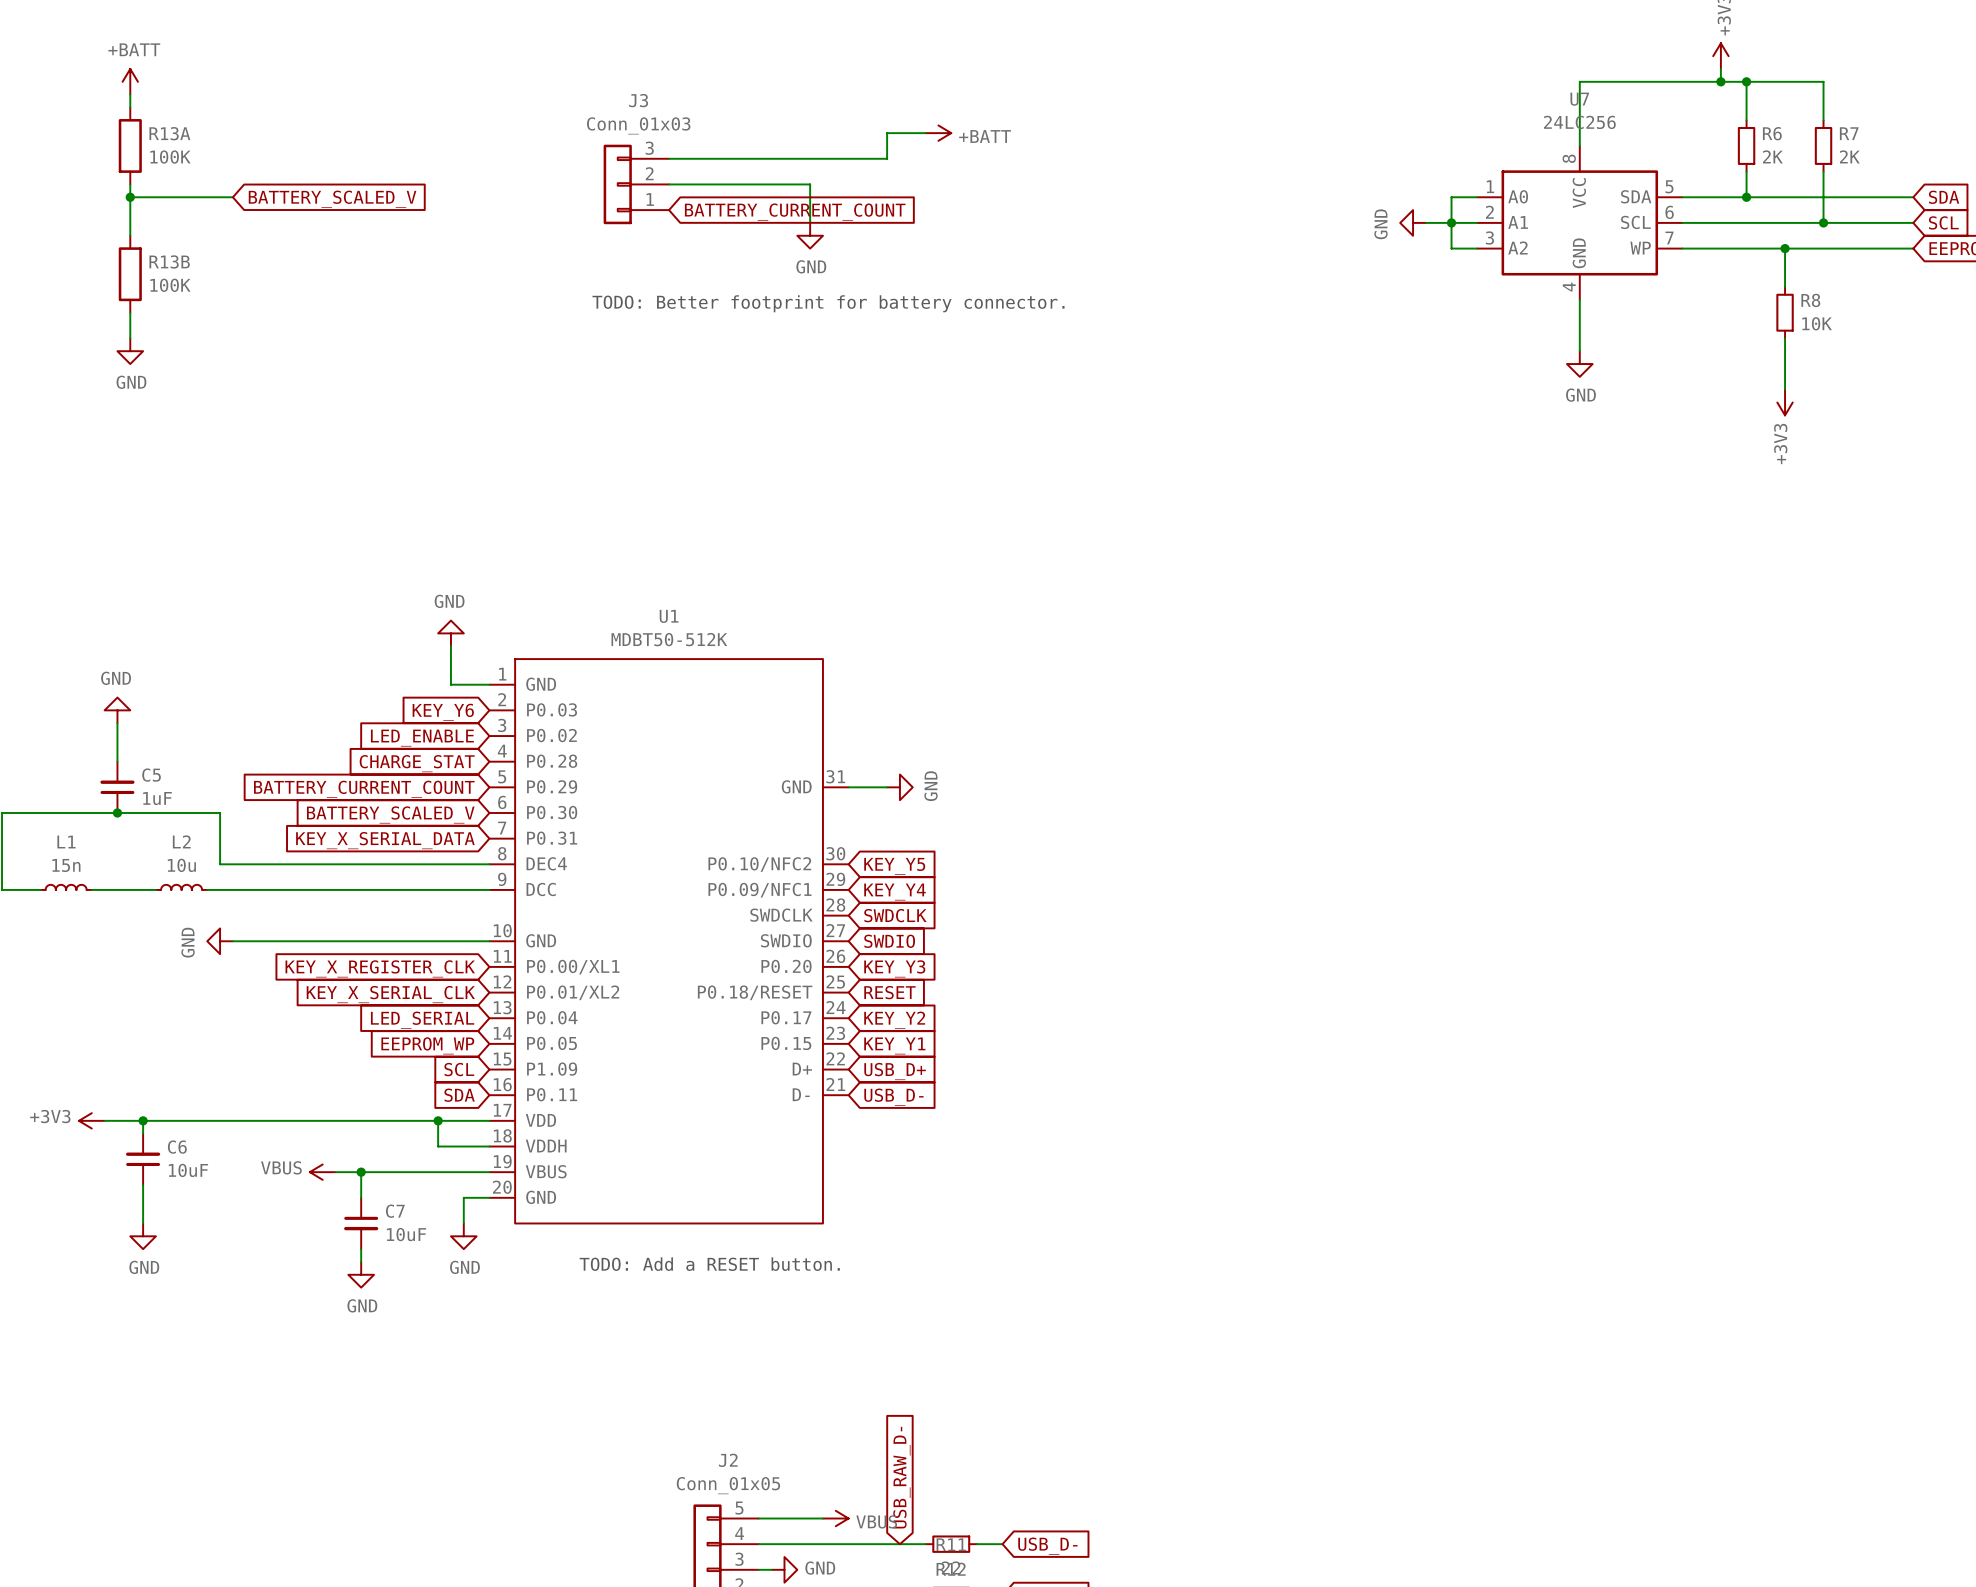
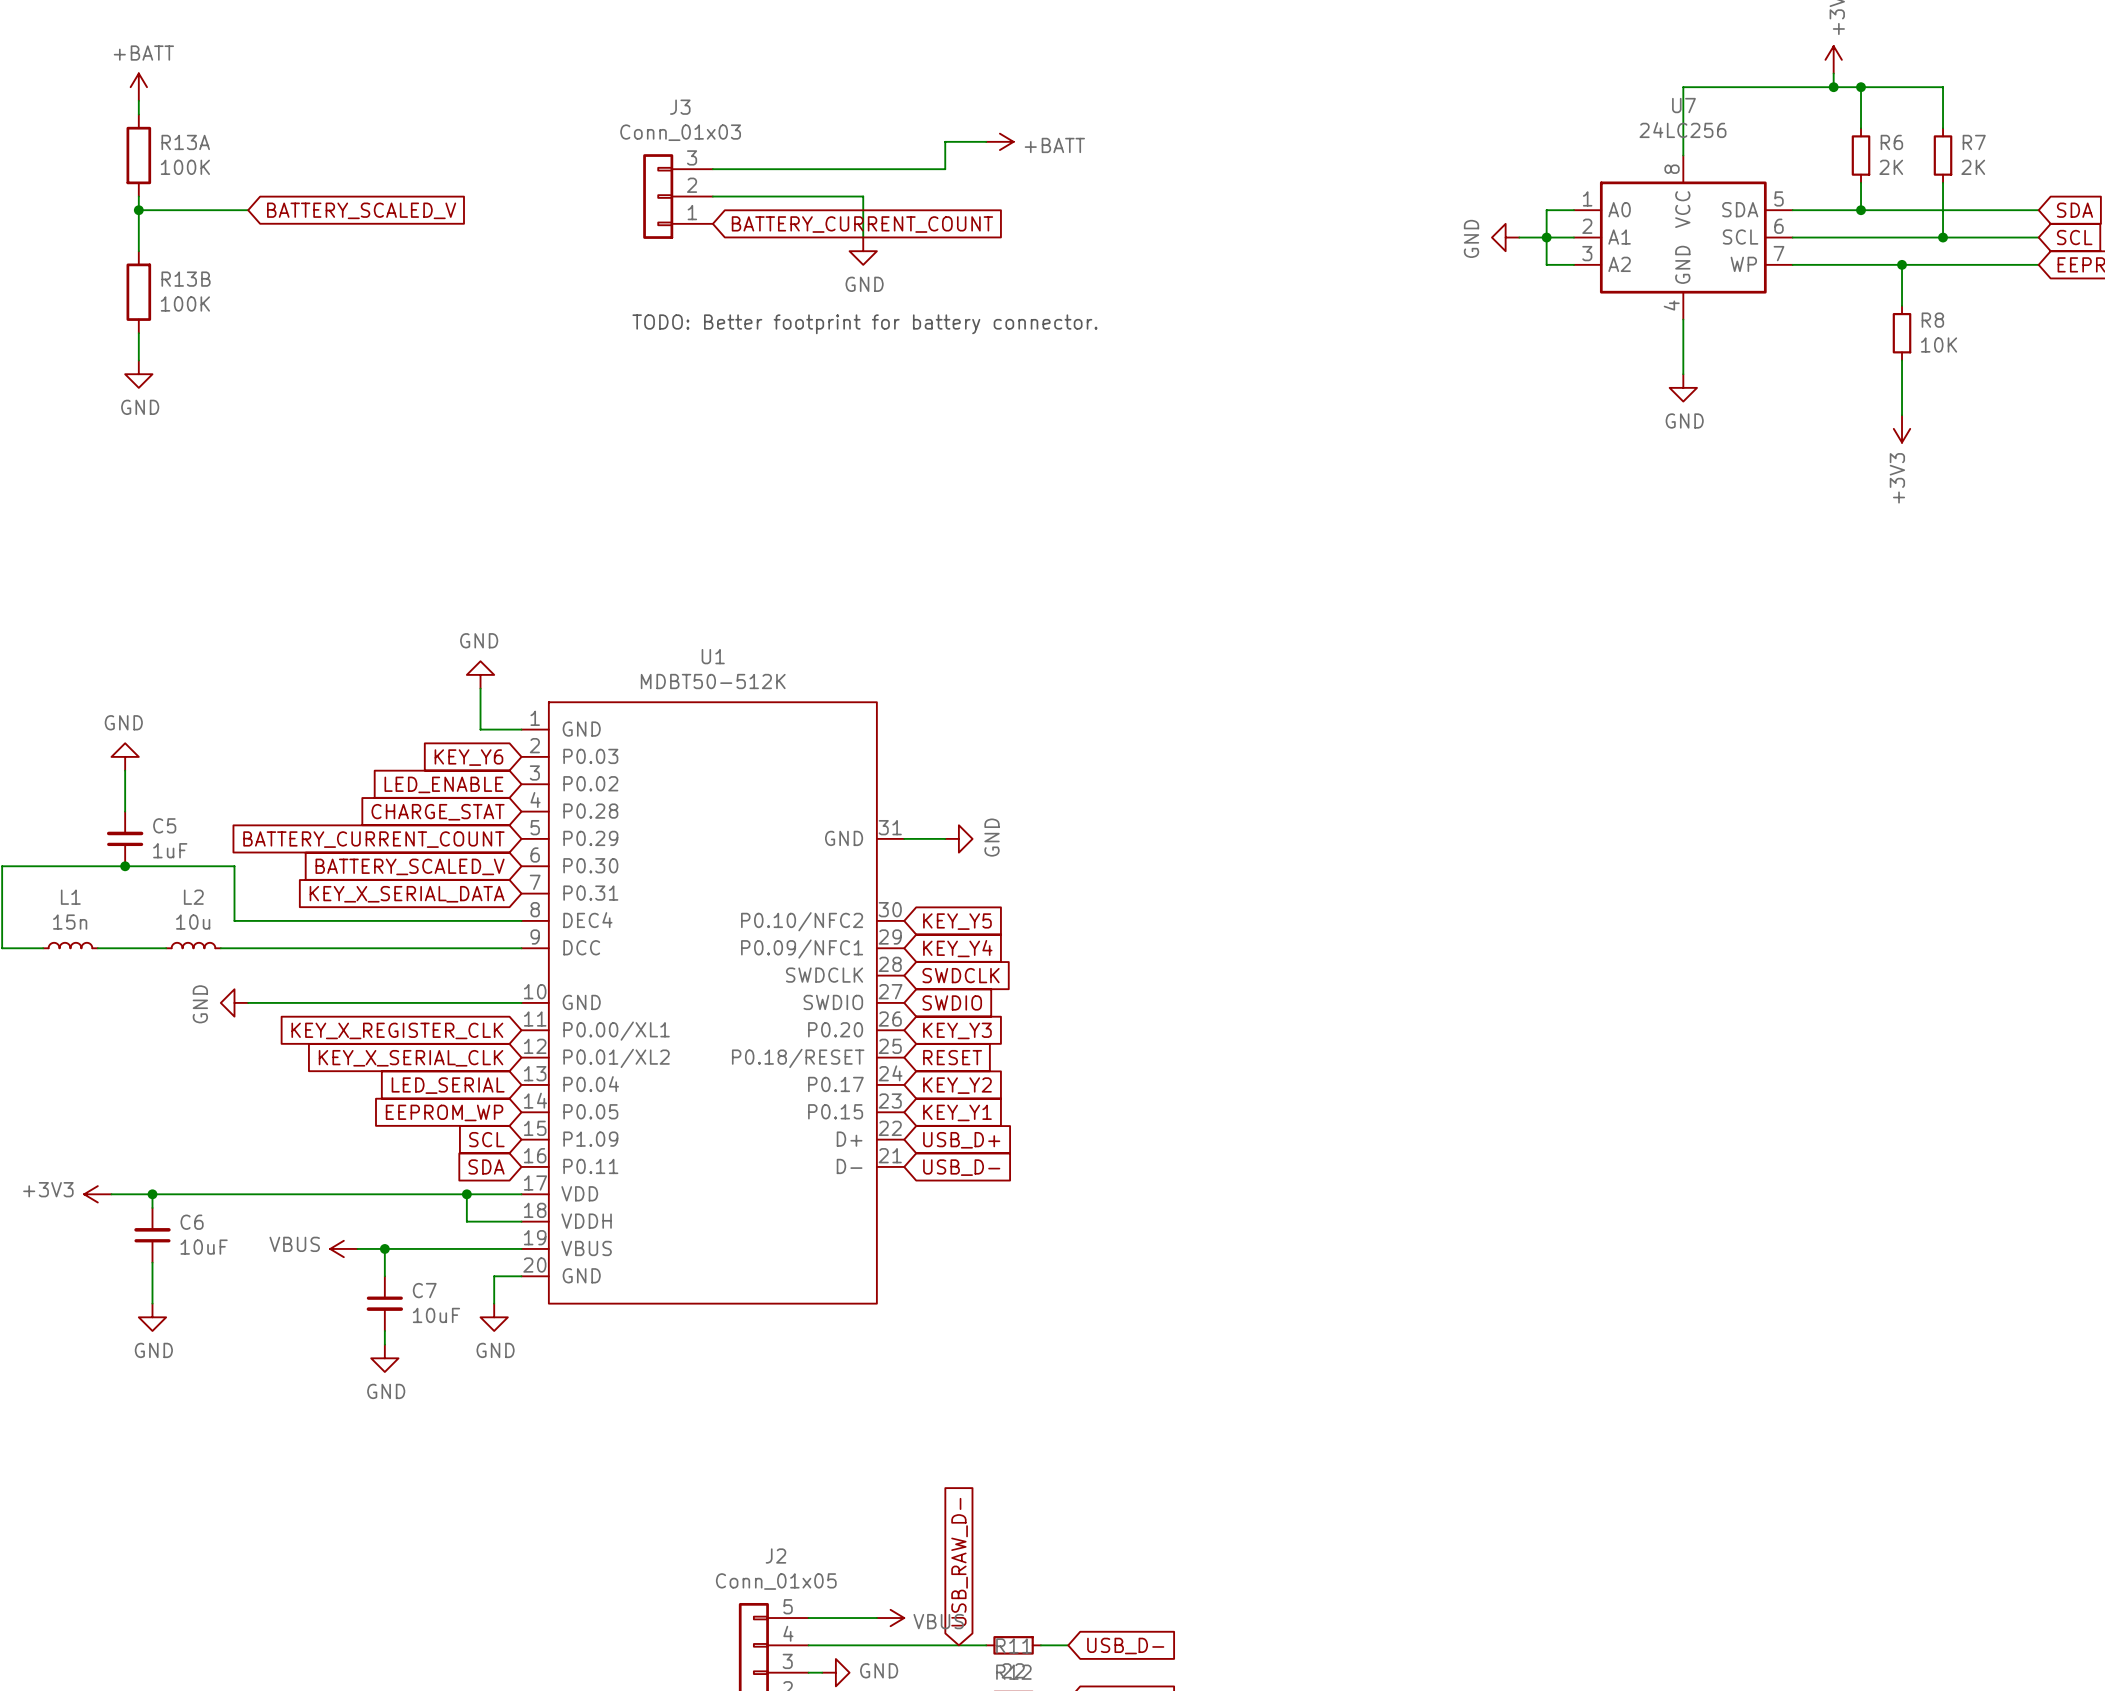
text: TODO: Add a RESET button. (709, 1264) -> none

